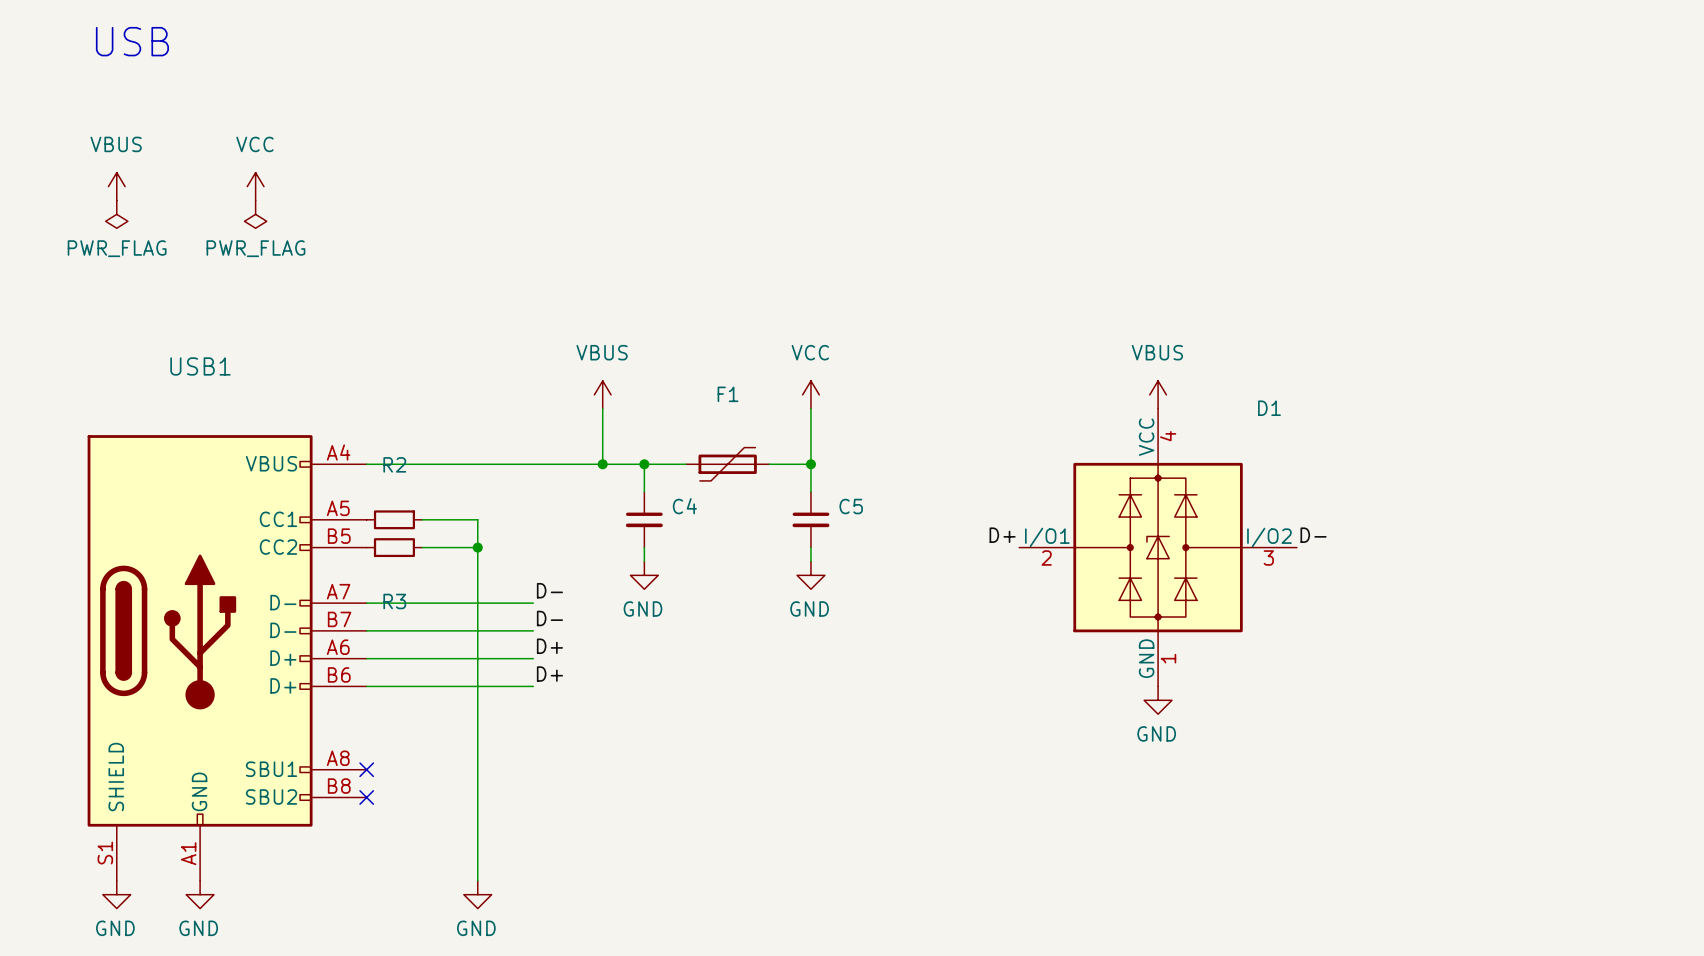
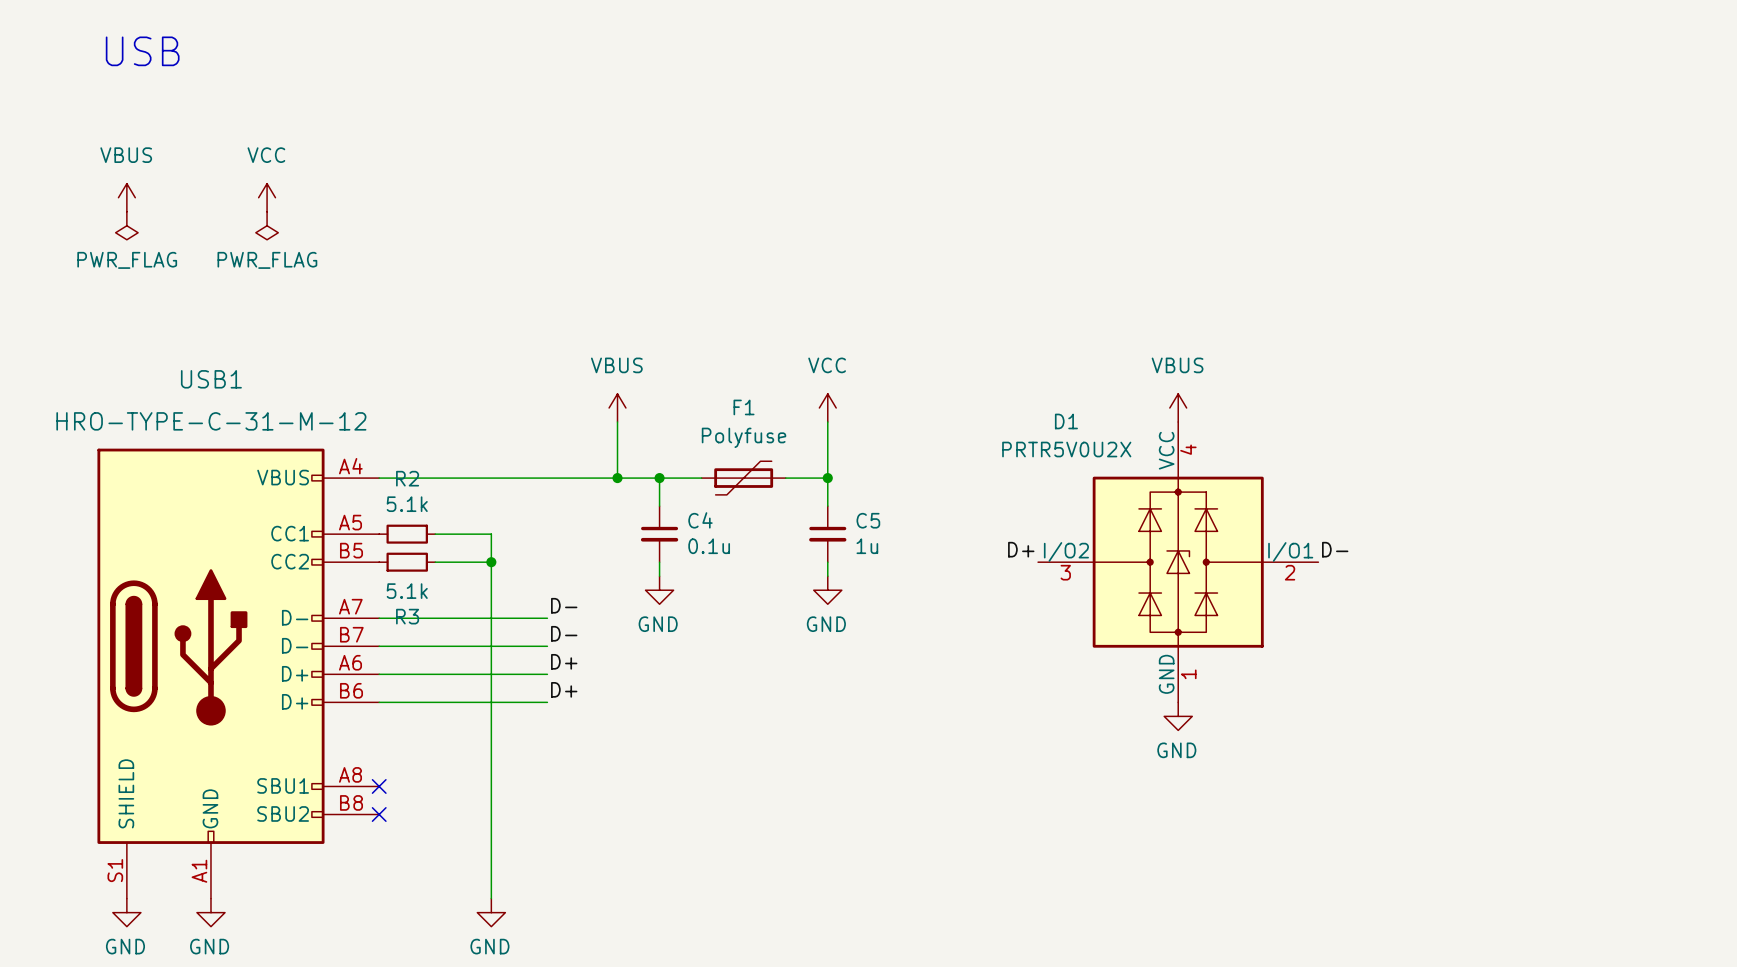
USB1 value: none -> HRO-TYPE-C-31-M-12 (211, 421)
F1 value: none -> Polyfuse (744, 437)
D1 value: none -> PRTR5V0U2X (1066, 449)
R2 value: none -> 5.1k (407, 504)
C4 value: none -> 0.1u (709, 546)
C5 value: none -> 1u (867, 546)
D1 flip: as is (1158, 547) -> left-right (1178, 562)
R3 value: none -> 5.1k (407, 591)

